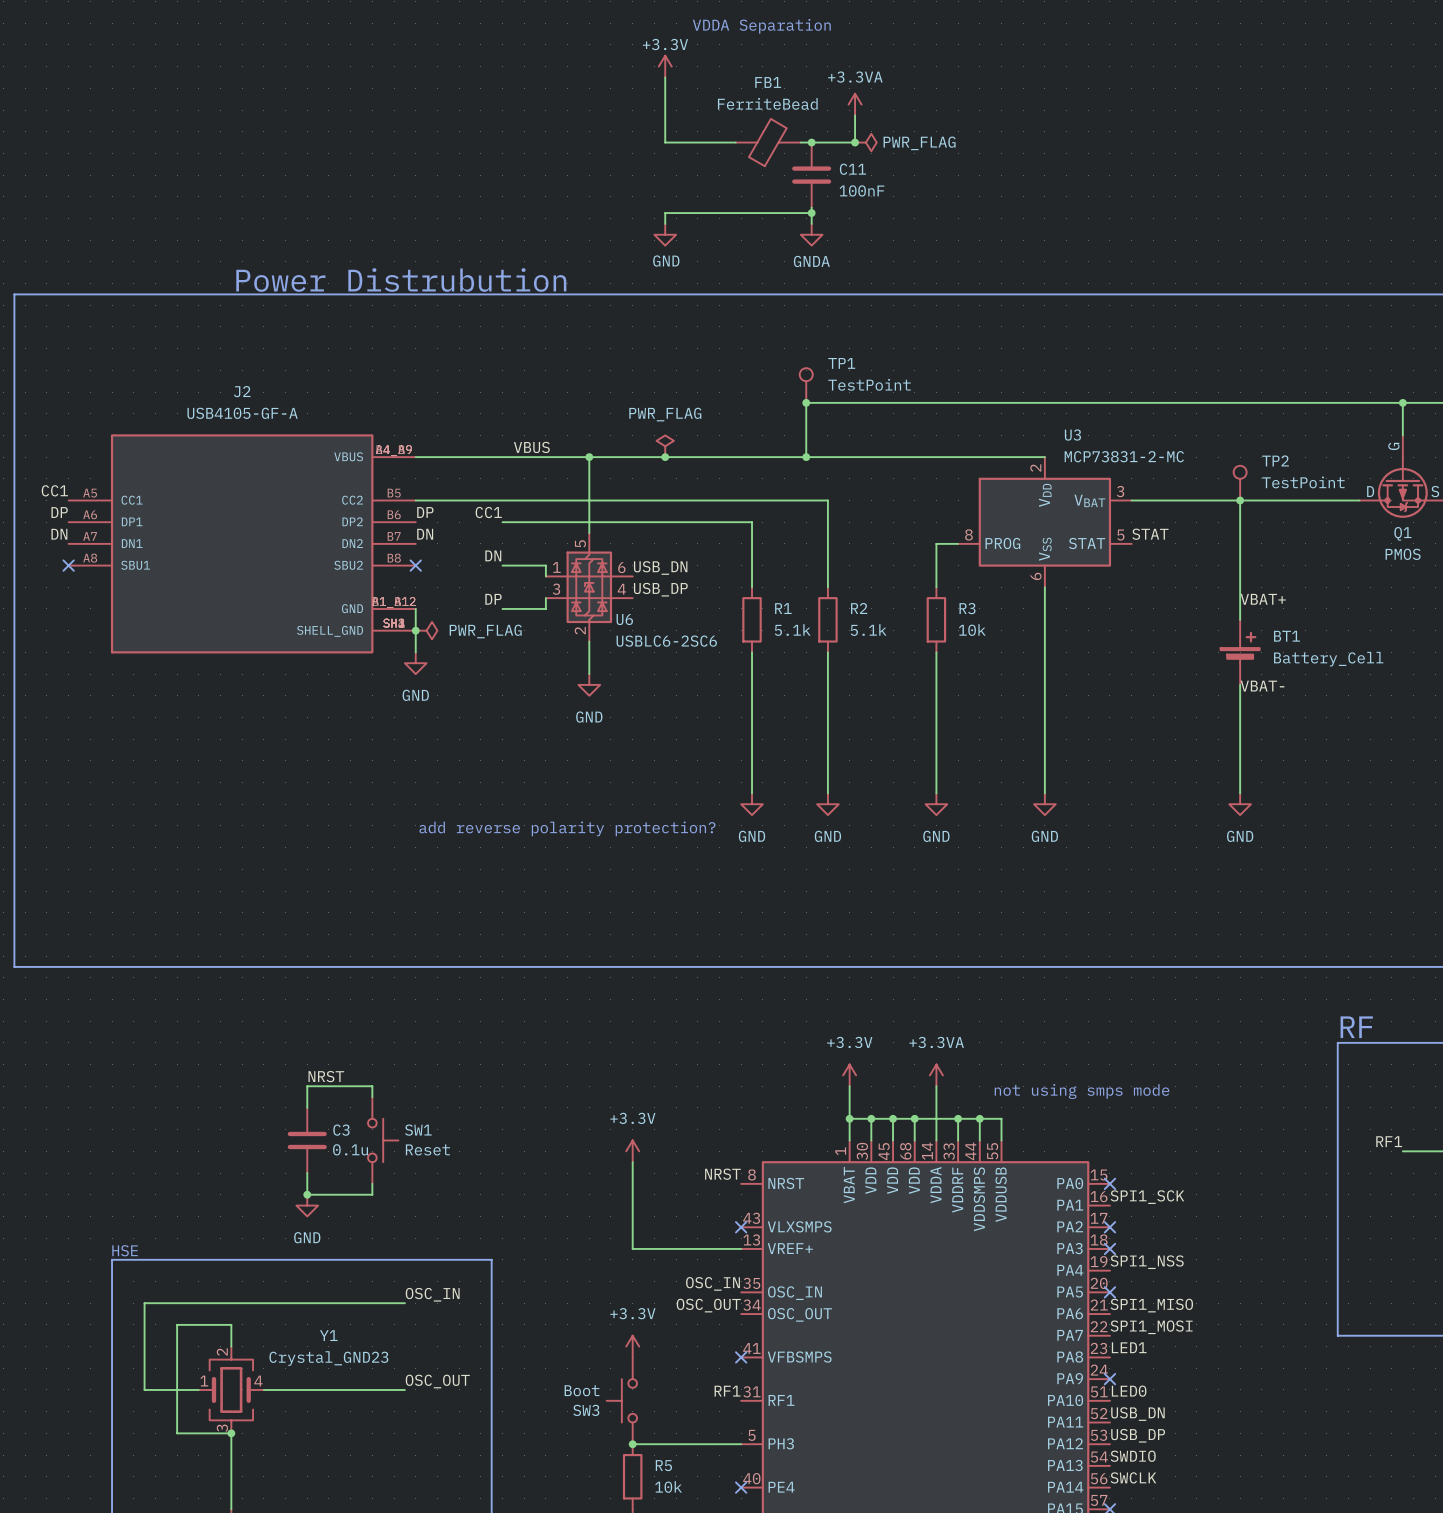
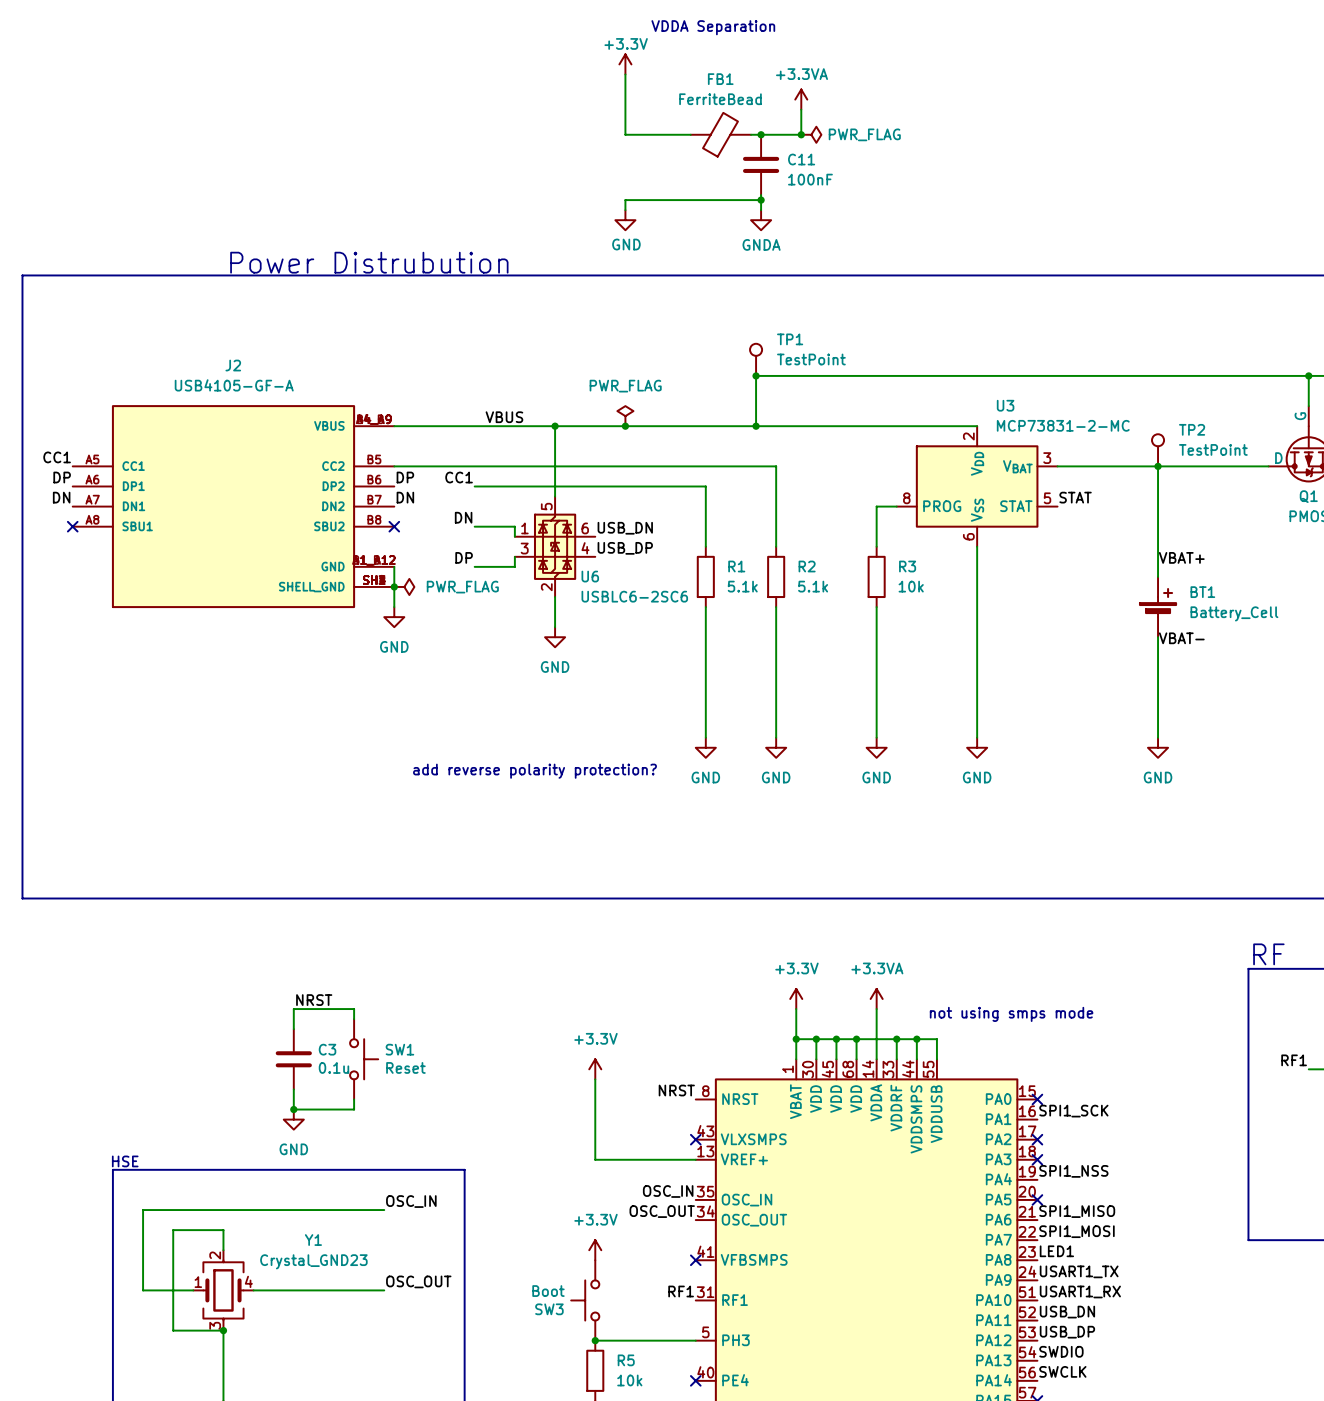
label: none -> USART1_TX (1079, 1271)
no-connect mark: (1109, 1379) -> none
label: LED0 (1129, 1391) -> USART1_RX (1080, 1291)

